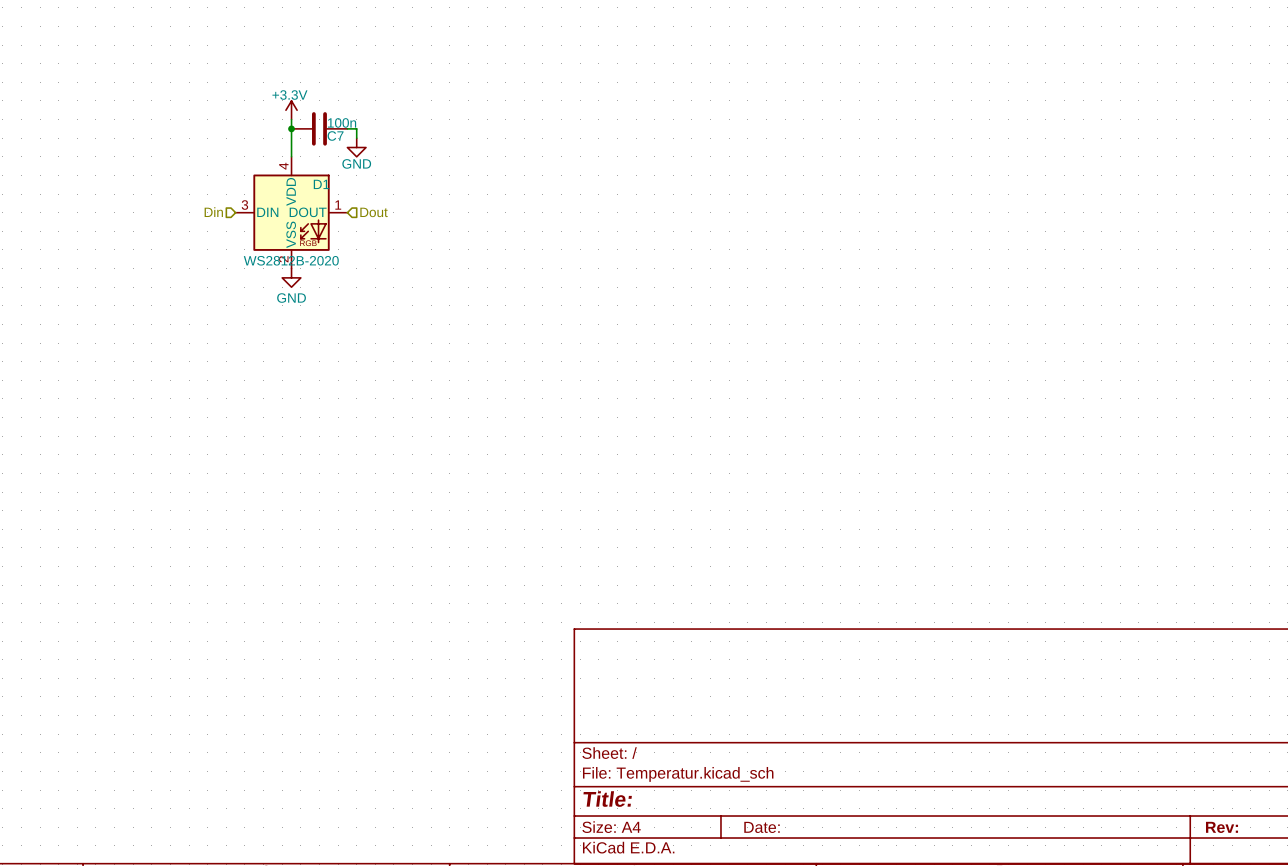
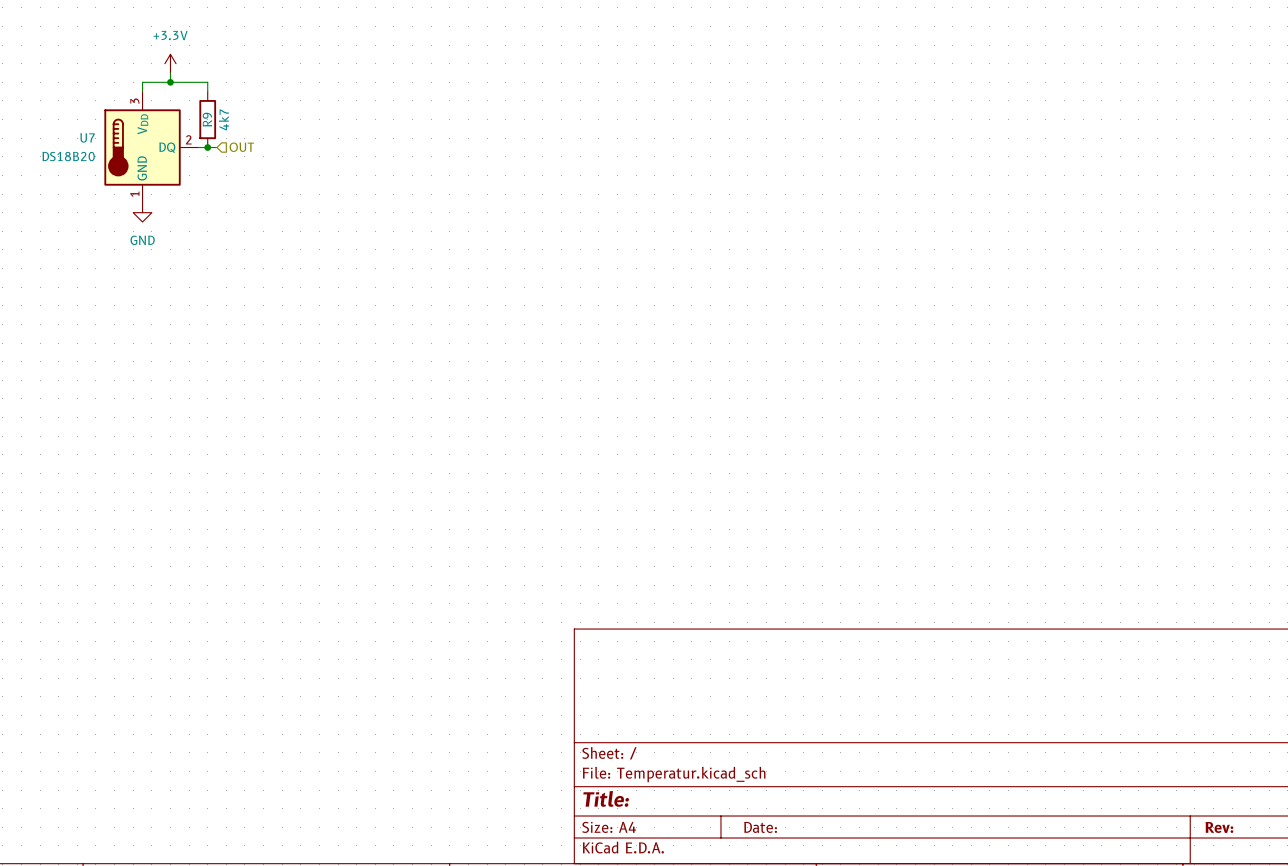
wire: none -> (170, 73) (170, 82)
junction: none -> (170, 82)
wire: none -> (142, 91) (142, 82) (207, 82) (207, 91)
power symbol text position: +3.3V (289, 95) -> +3.3V (170, 35)
power symbol position: +3.3V (291, 110) -> +3.3V (170, 63)
R9: none -> 4k7 (207, 119)
wire: (291, 119) (291, 156) -> none
junction: (291, 128) -> none
C7: 100n (319, 128) -> none
wire: (347, 128) (356, 128) (356, 138) -> none
U7: none -> DS18B20 (151, 147)
wire: none -> (198, 147) (217, 147)
junction: none -> (207, 147)
hierarchical label: none -> OUT (241, 147)
power symbol: GND (356, 147) -> none
power symbol: none -> GND (142, 212)
hierarchical label: Din (213, 212) -> none
D1: WS2812B-2020 (291, 212) -> none
hierarchical label: Dout (374, 212) -> none
power symbol: GND (291, 277) -> none

